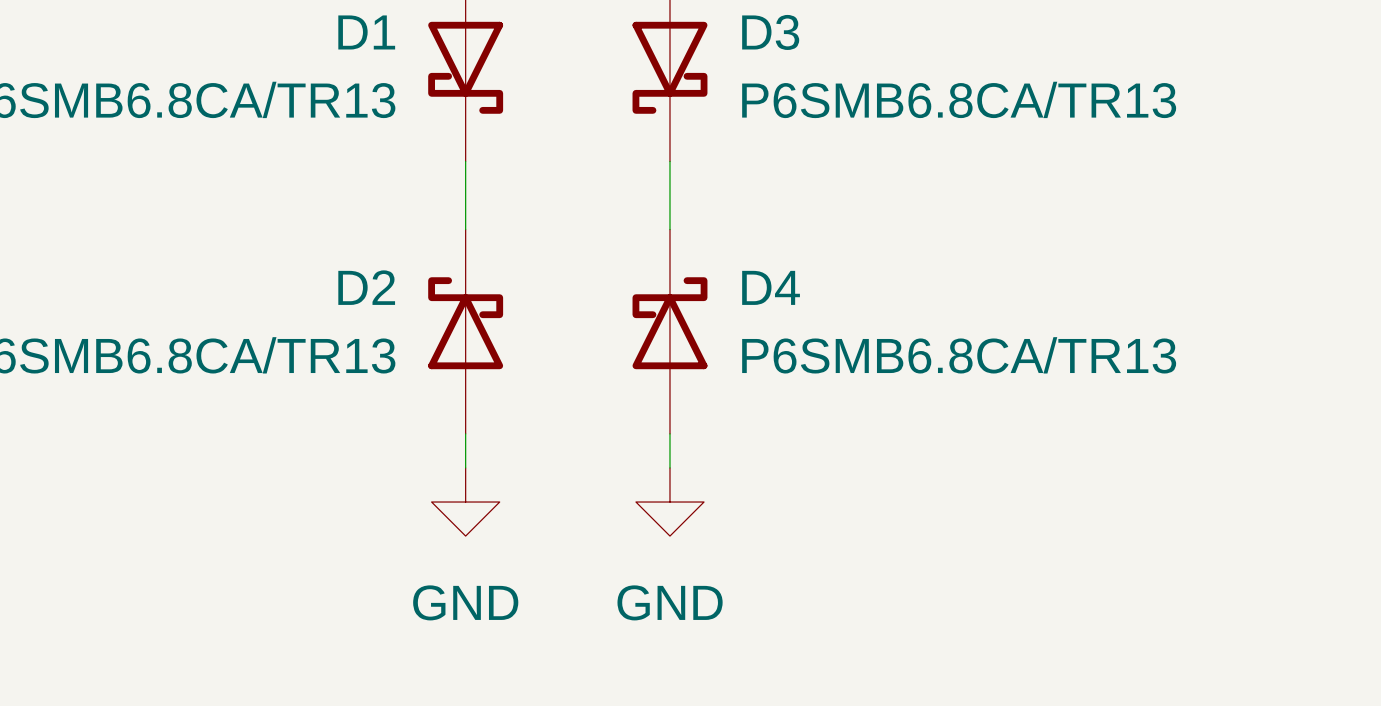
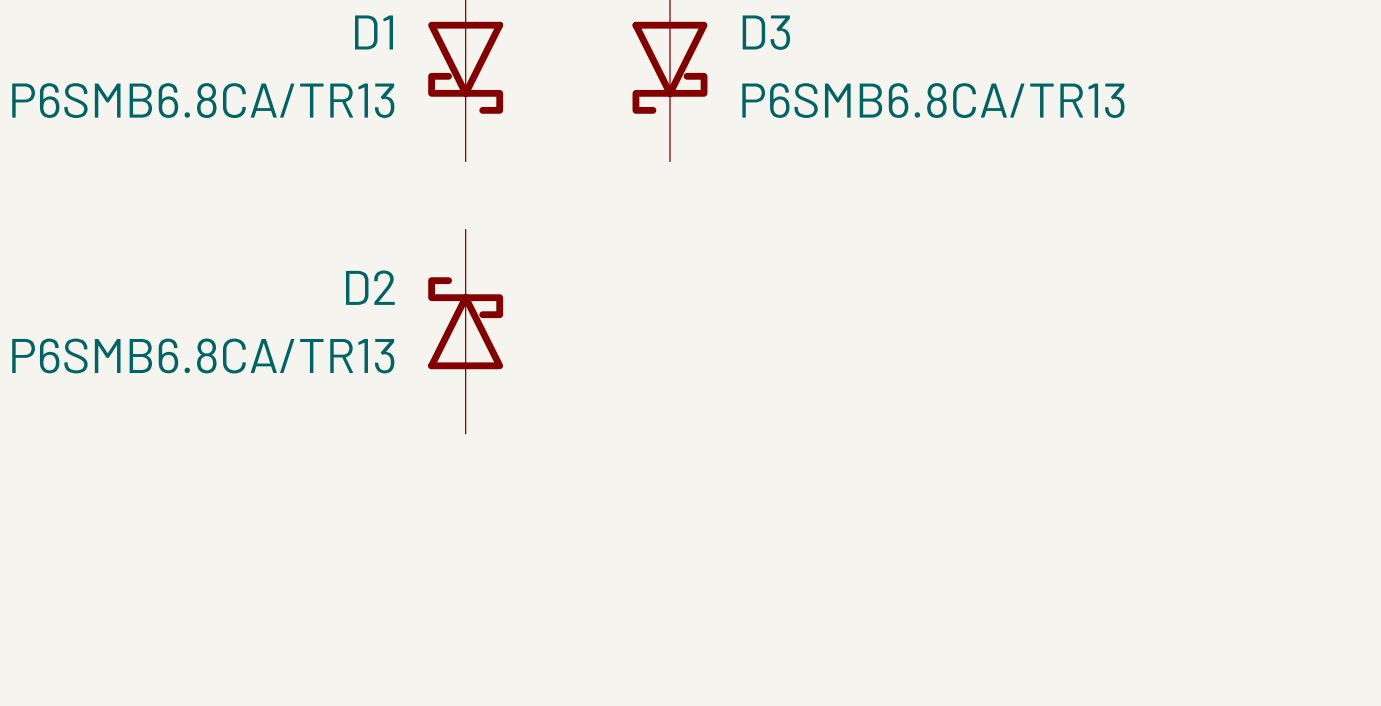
wire: (465, 161) (465, 229) -> none
wire: (669, 161) (669, 229) -> none
D4: P6SMB6.8CA/TR13 (669, 331) -> none
wire: (465, 433) (465, 467) -> none
wire: (669, 433) (669, 467) -> none
power symbol: GND (465, 502) -> none
power symbol: GND (669, 502) -> none

